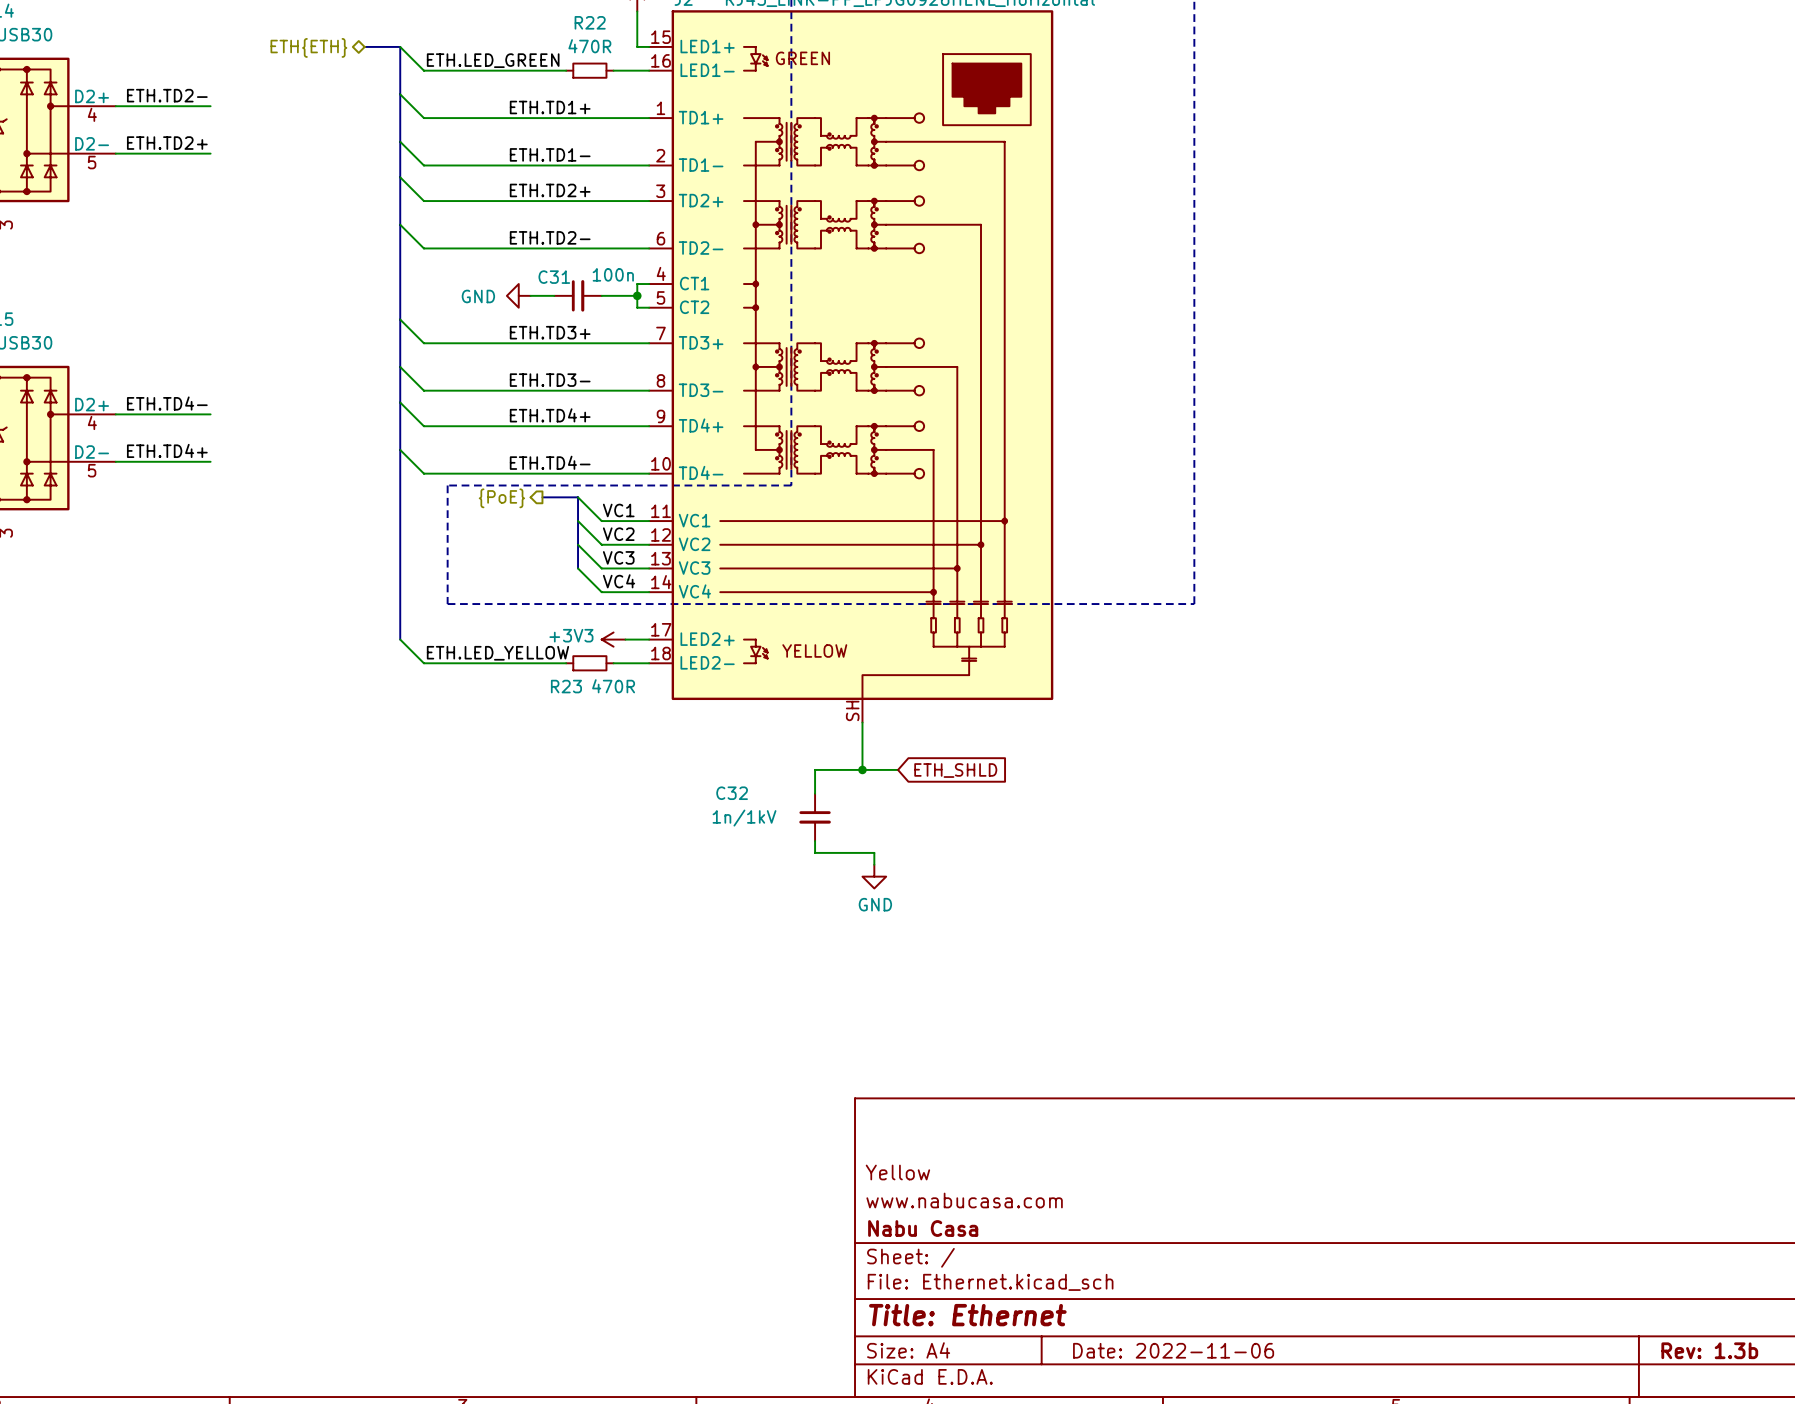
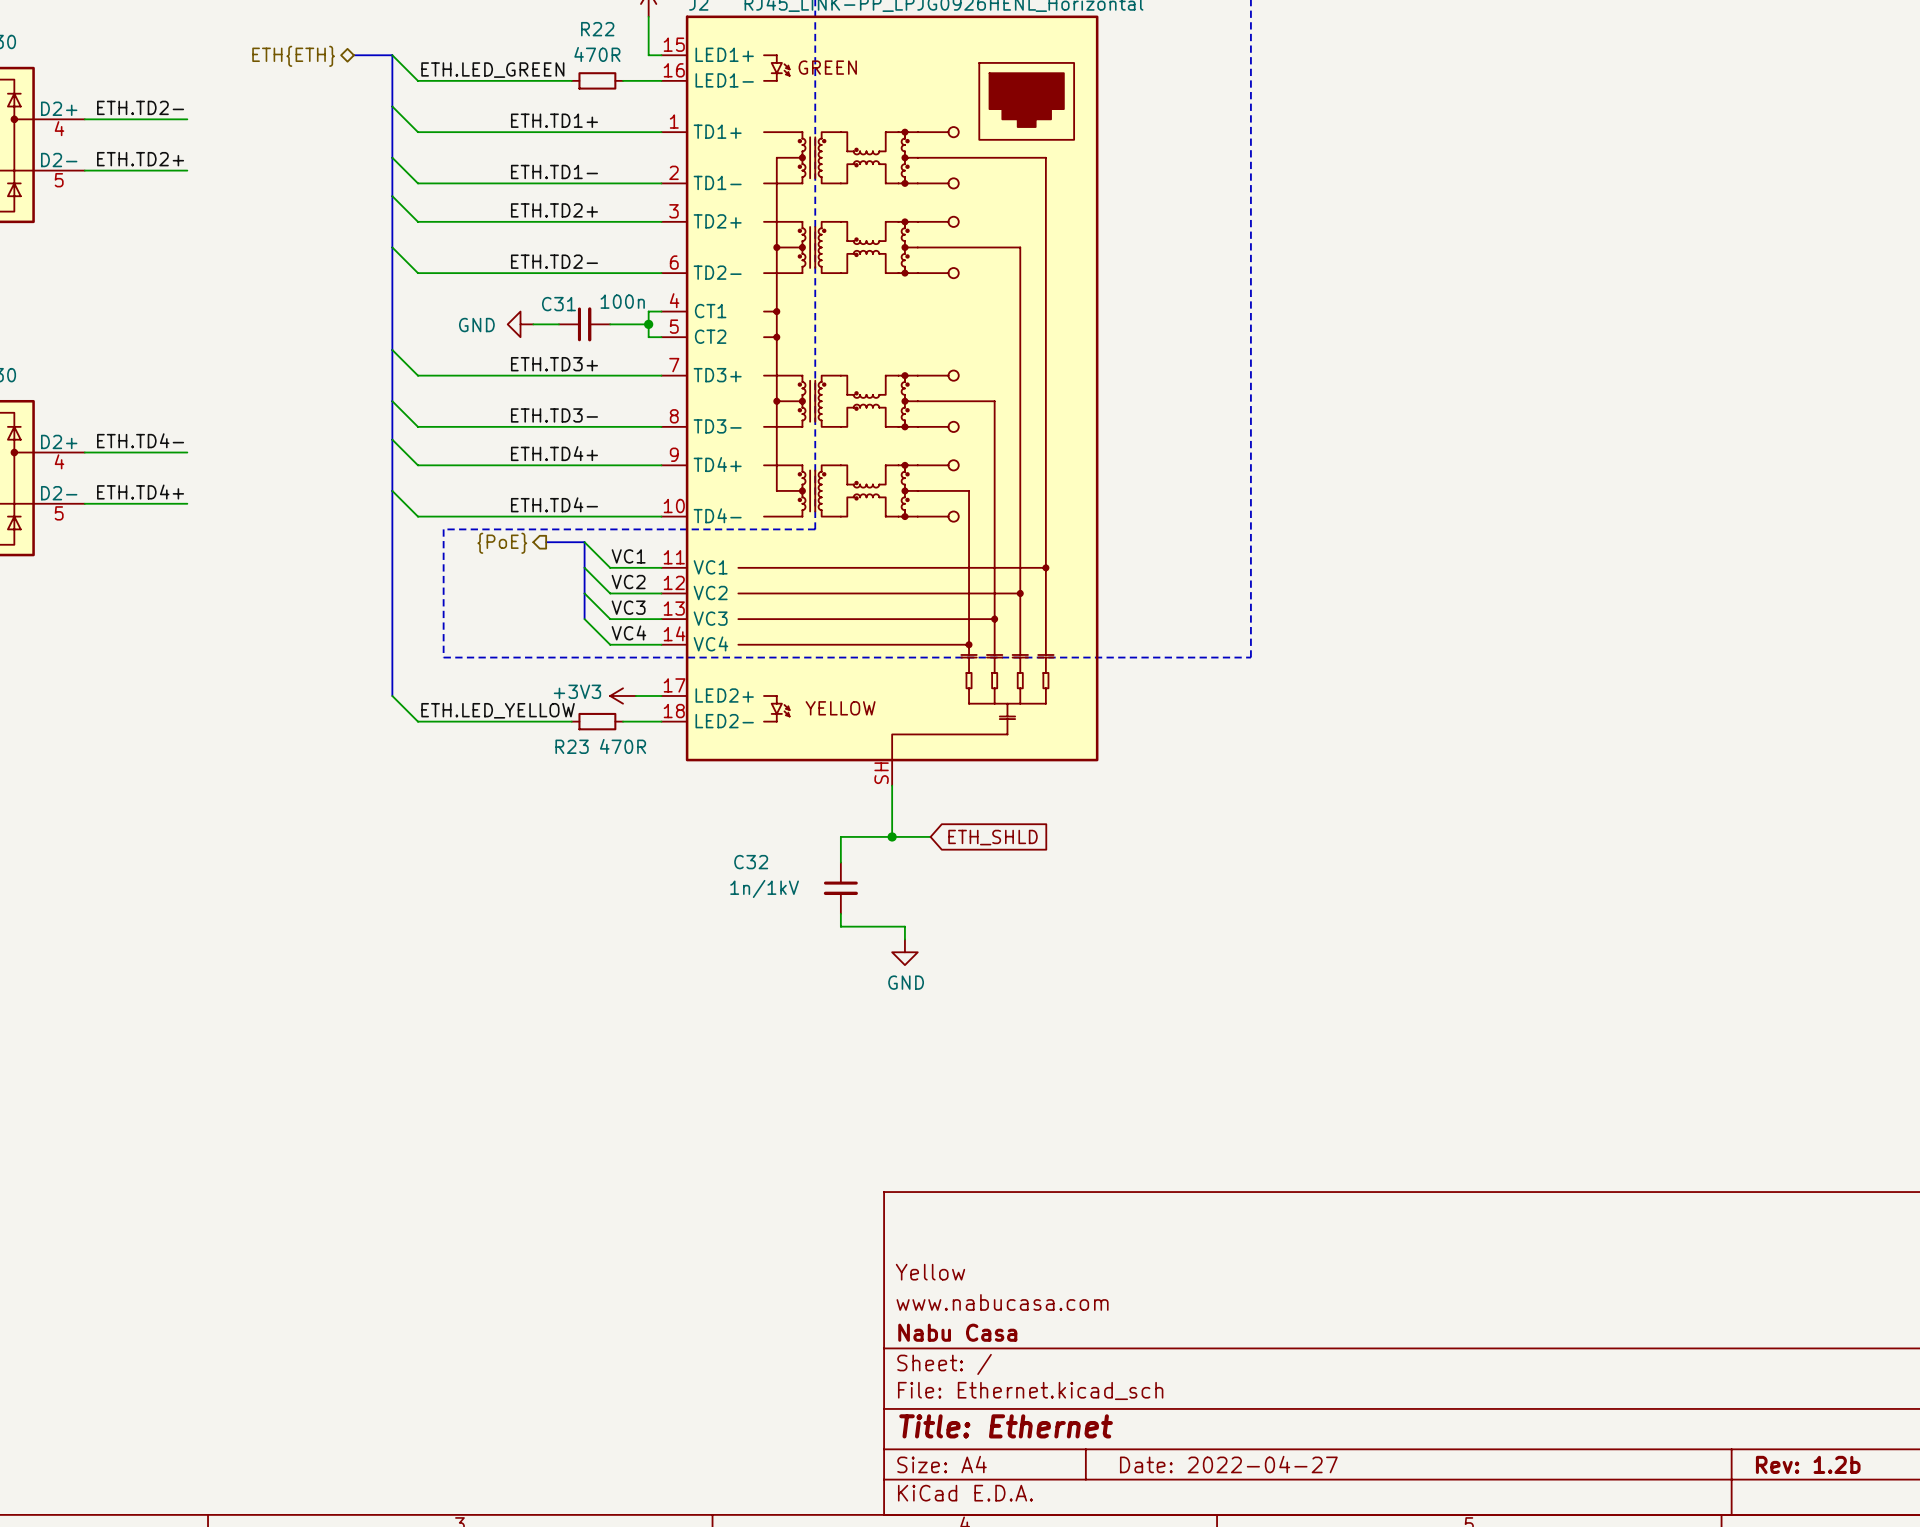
title block: Date: 2022-11-06 (1173, 1350) -> Date: 2022-04-27 (1228, 1464)
title block: Rev: 1.3b (1709, 1350) -> Rev: 1.2b (1808, 1464)

